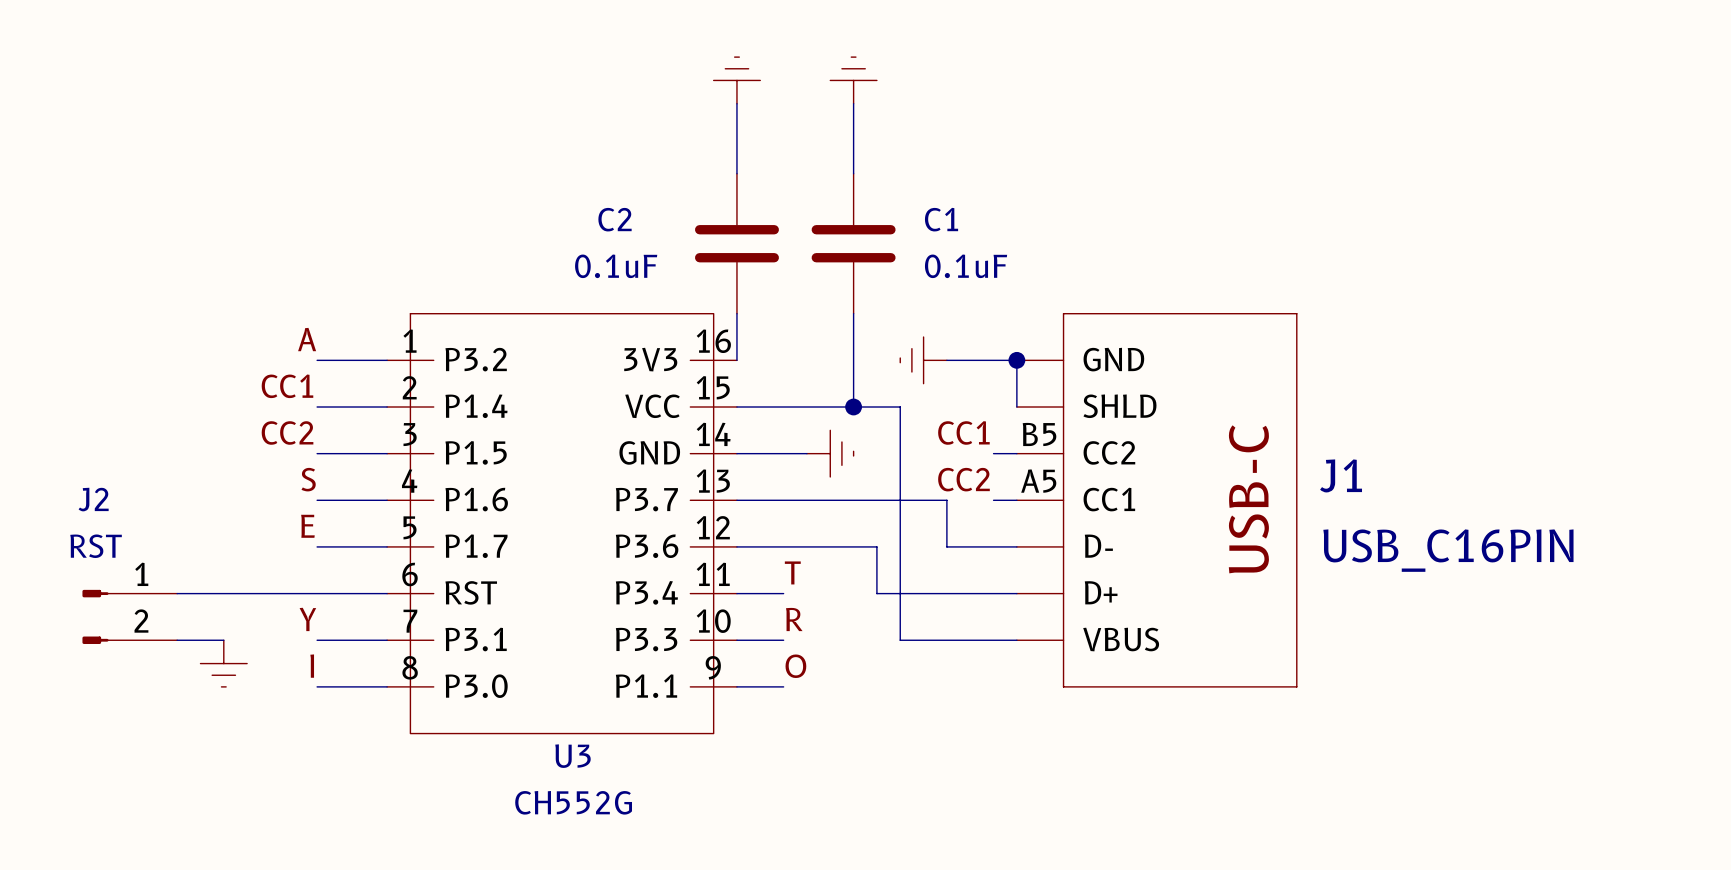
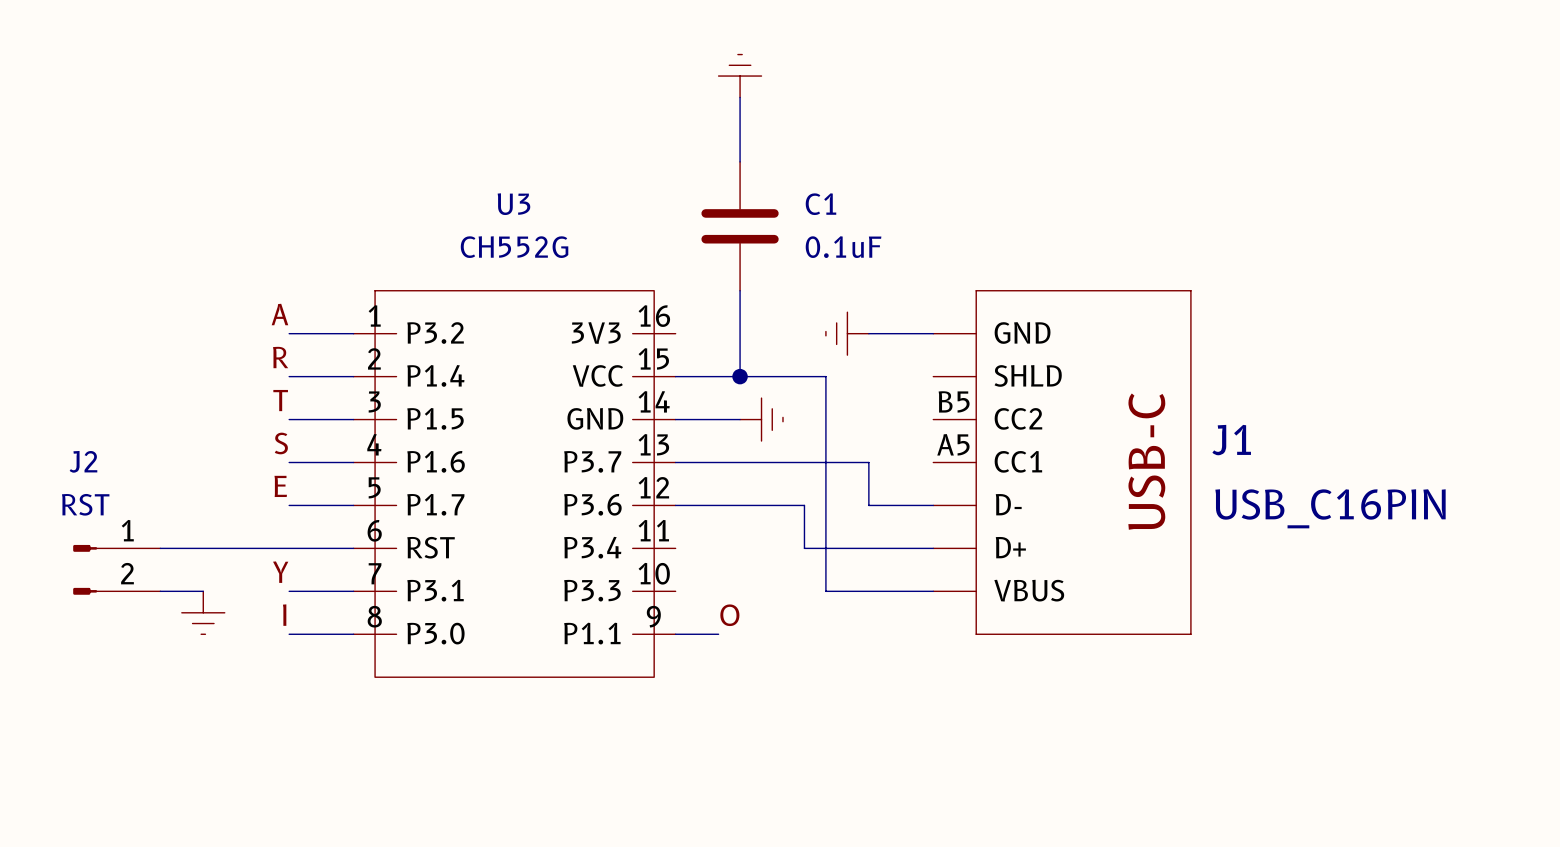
power symbol: (736, 80) -> none
power symbol: none -> (740, 76)
power symbol: (853, 80) -> none
wire: (736, 103) (736, 173) -> none
wire: (853, 103) (853, 173) -> (740, 97) (740, 161)
C2: 0.1uF (736, 243) -> none
C1 position: (853, 243) -> (740, 226)
wire: (736, 313) (736, 360) -> none
wire: (853, 313) (853, 407) -> (740, 290) (740, 376)
wire: (1016, 360) (1016, 407) -> none
junction: (1016, 360) -> none
label: CC1 (287, 386) -> R (280, 357)
junction position: (853, 407) -> (740, 376)
label: CC2 (287, 432) -> T (280, 400)
label: CC1 (963, 432) -> none
wire: (993, 453) (1016, 453) -> none
label: CC2 (963, 479) -> none
wire: (993, 500) (1016, 500) -> none
label: T (792, 572) -> none
wire: (736, 593) (783, 593) -> none
label: R (794, 619) -> none
wire: (736, 640) (783, 640) -> none
U3 name position: U3 (572, 756) -> U3 (513, 204)
U3 value position: CH552G (573, 802) -> CH552G (514, 247)

